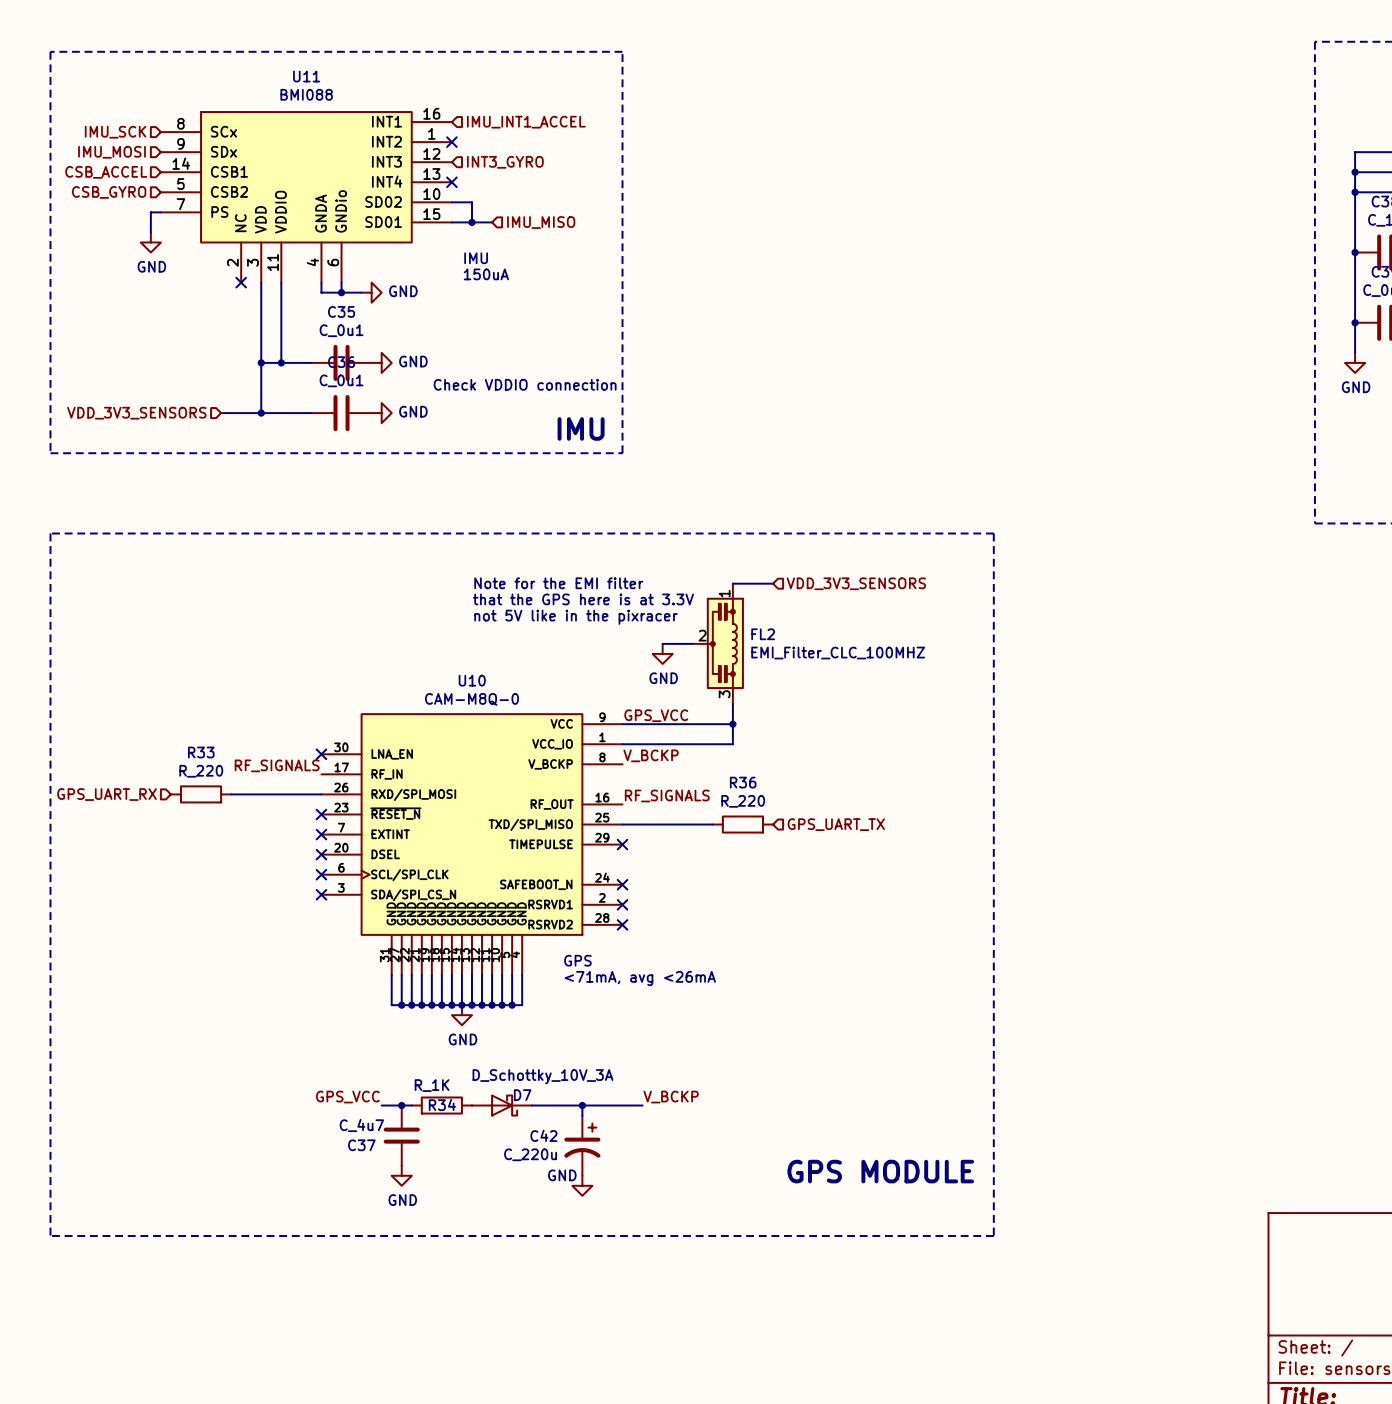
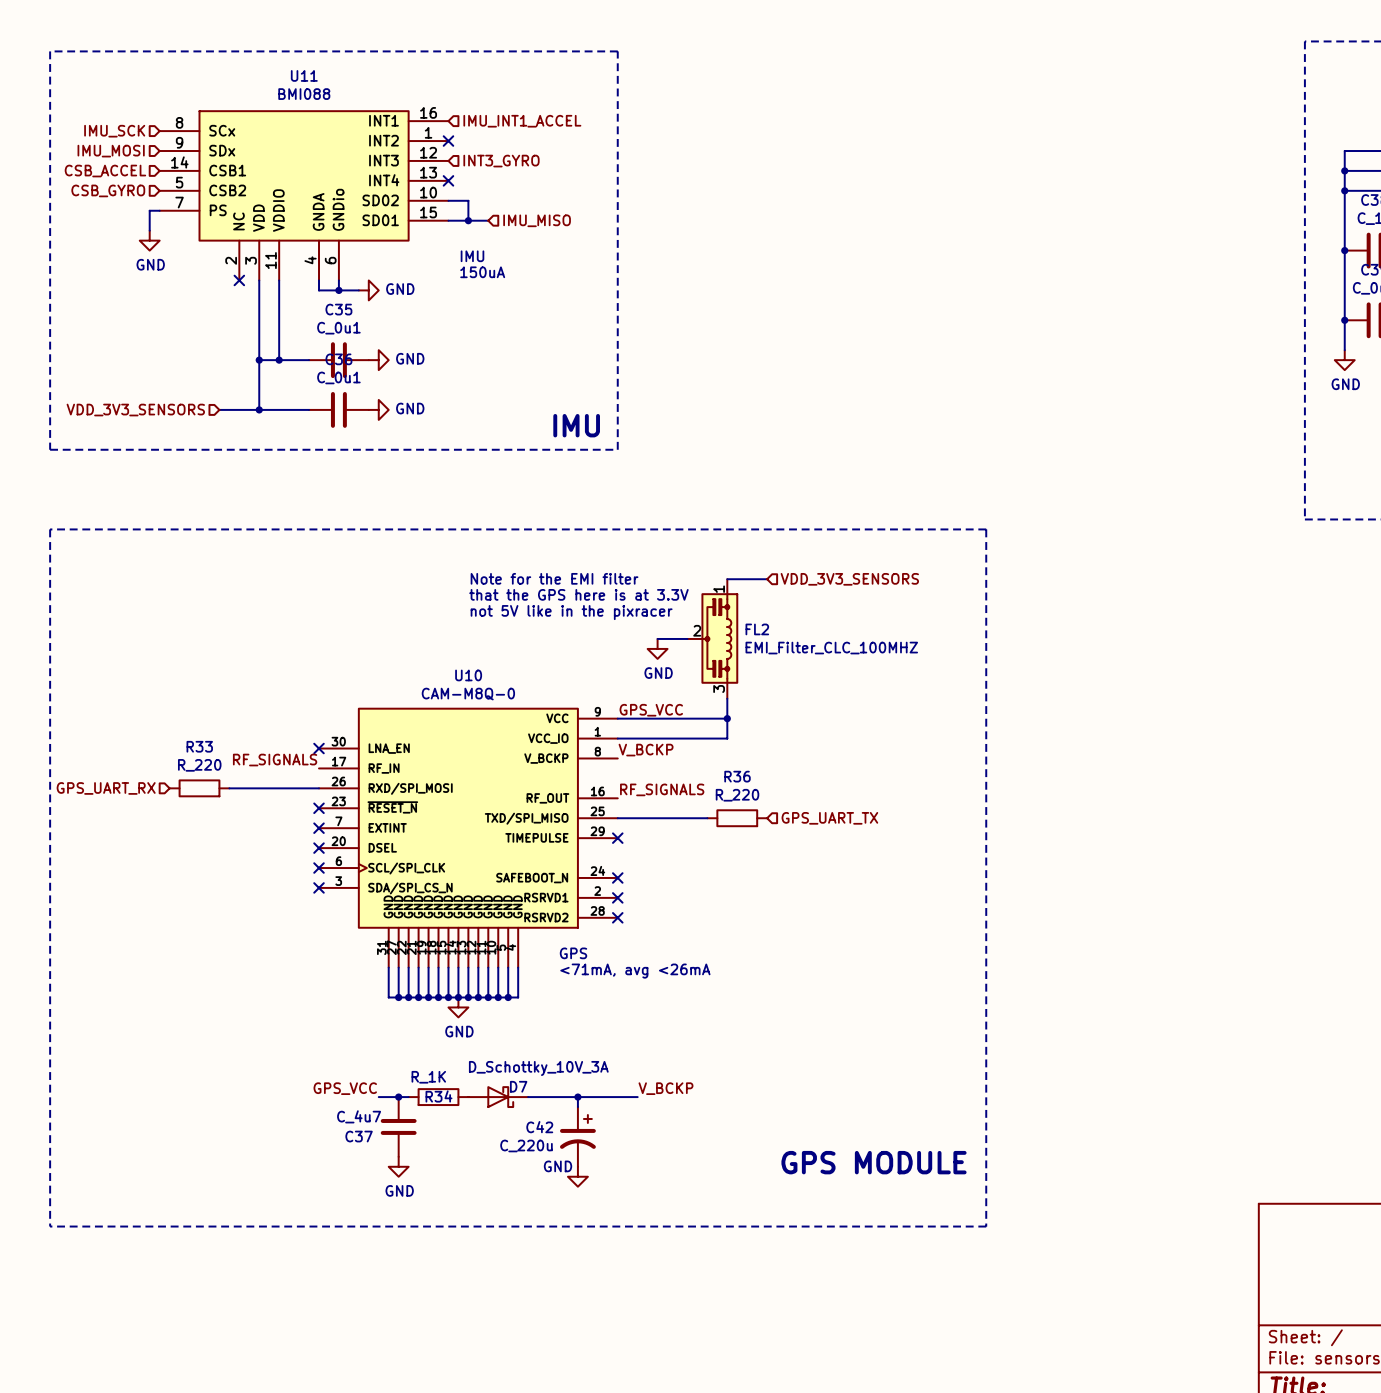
text: Check VDDIO connection (525, 384) -> none

